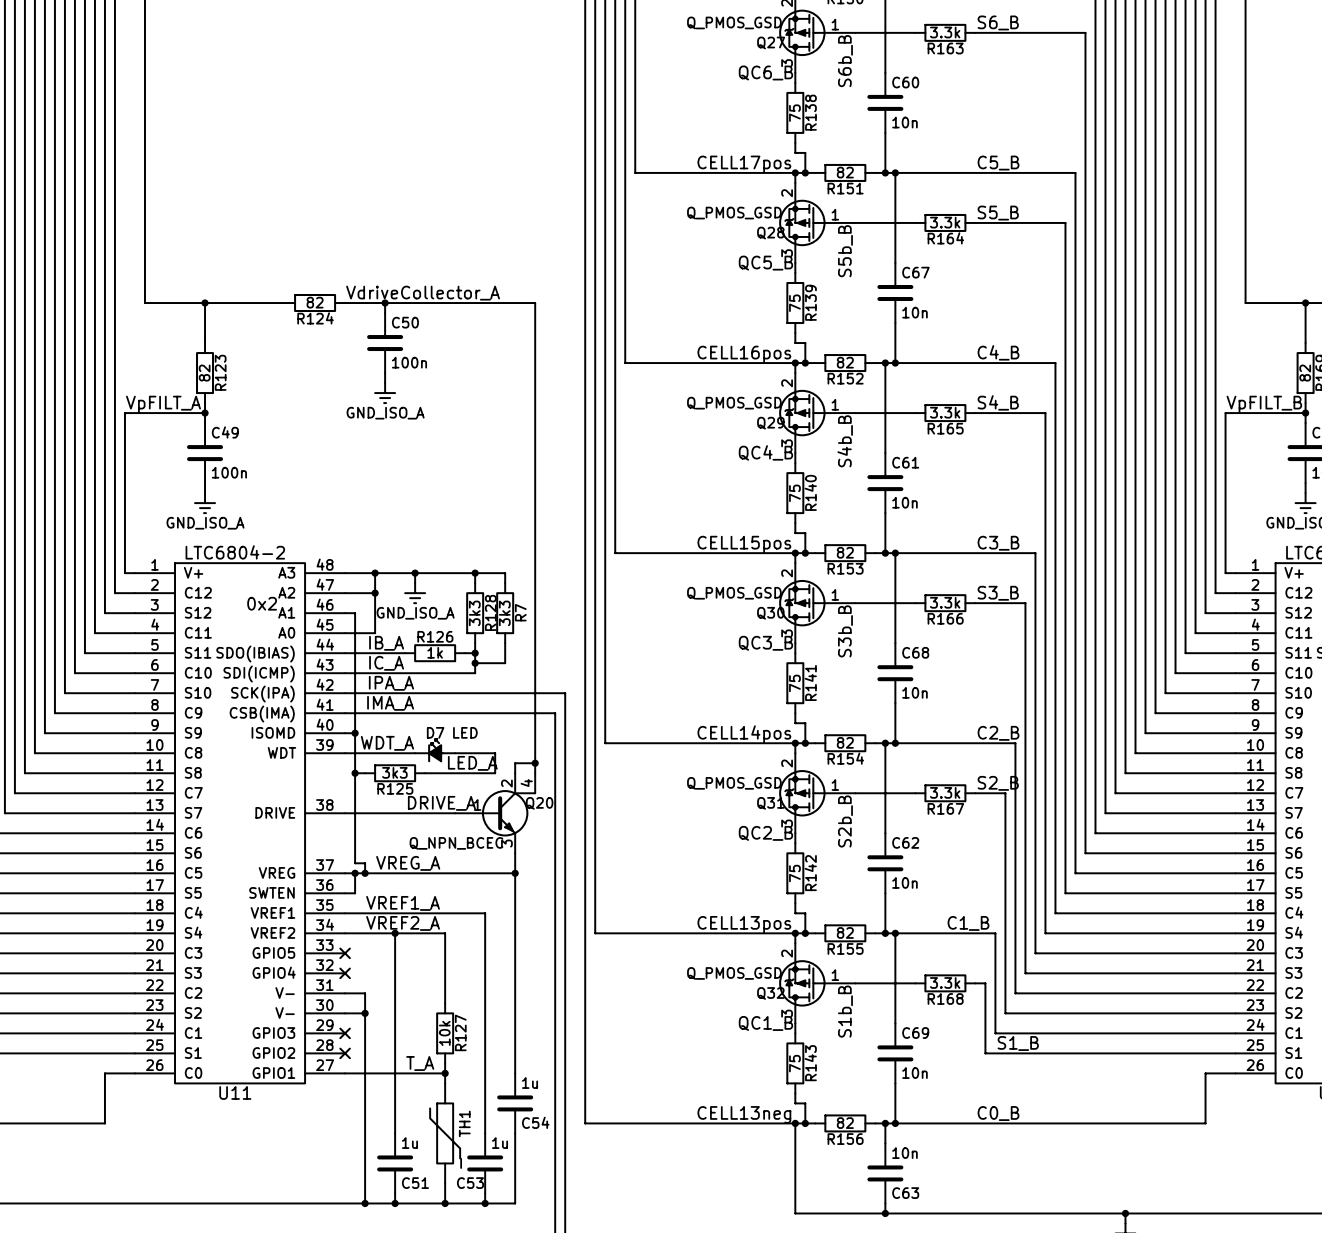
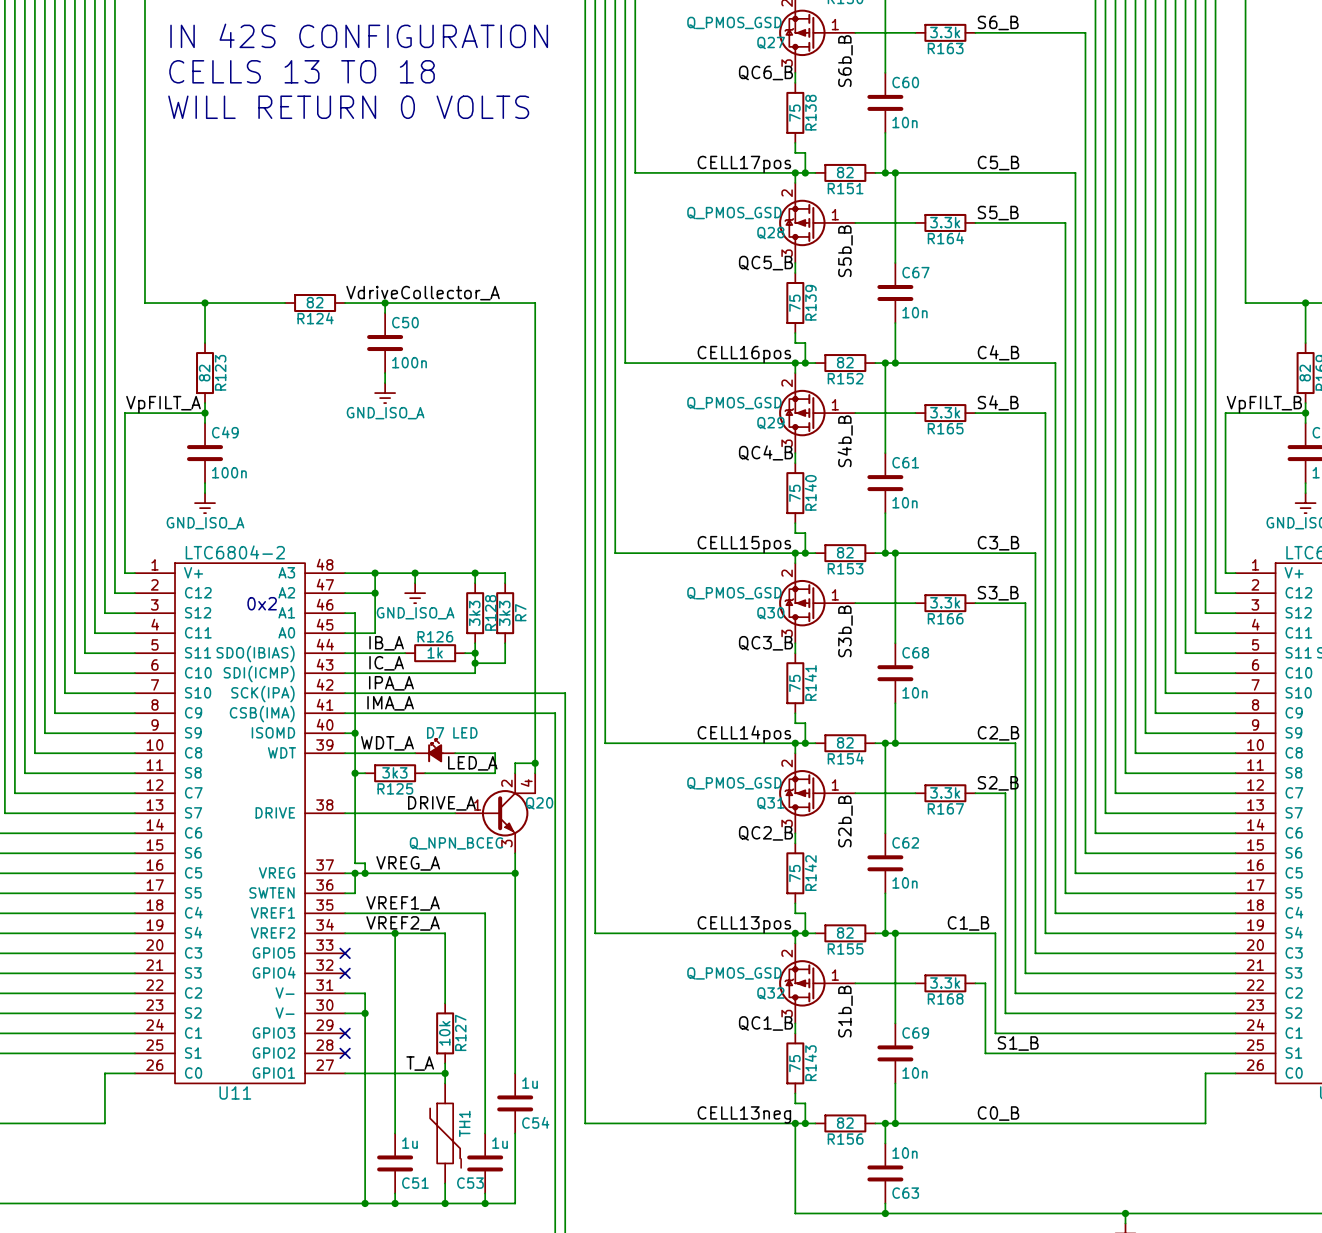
text: none -> IN 42S CONFIGURATION (359, 35)
text: none -> CELLS 13 TO 18 (302, 71)
text: none -> WILL RETURN 0 VOLTS (348, 107)

